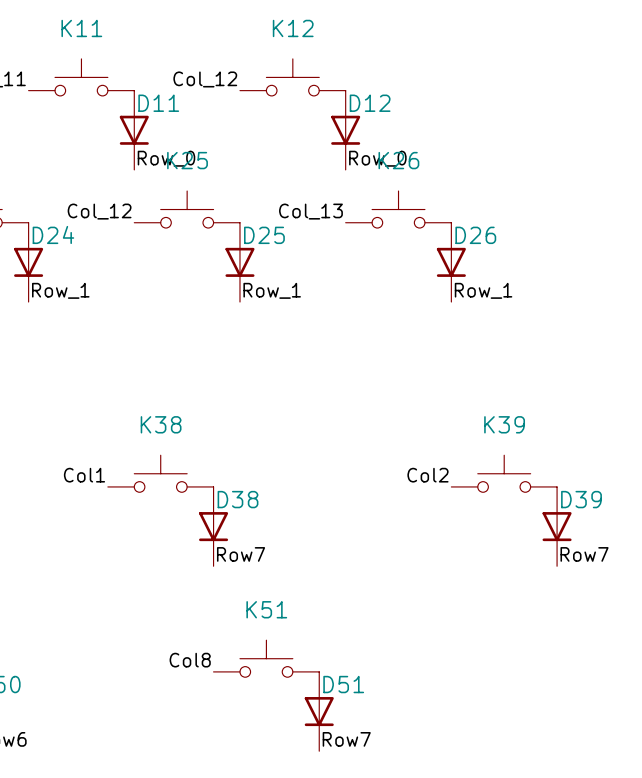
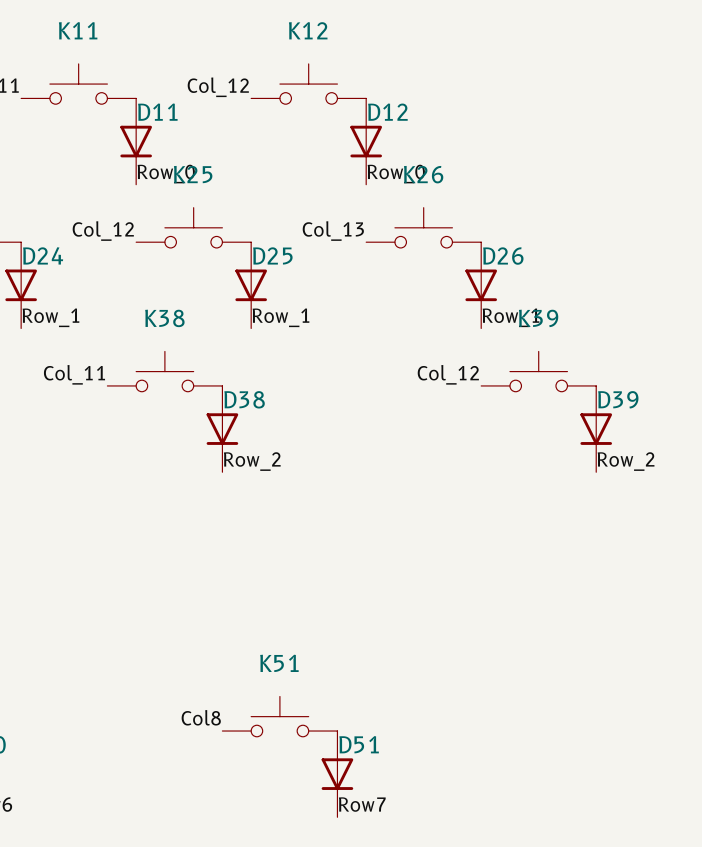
label: none -> Col_11 (74, 374)
label: none -> Col_12 (448, 374)
label: none -> Row_2 (252, 461)
label: none -> Row_2 (626, 461)
K38 position: (160, 473) -> (164, 371)
K39 position: (504, 473) -> (538, 371)
label: Col1 (84, 475) -> none
label: Col2 (427, 475) -> none
D38 position: (213, 526) -> (222, 429)
D39 position: (557, 526) -> (596, 429)
label: Row7 (241, 554) -> none
label: Row7 (584, 554) -> none

